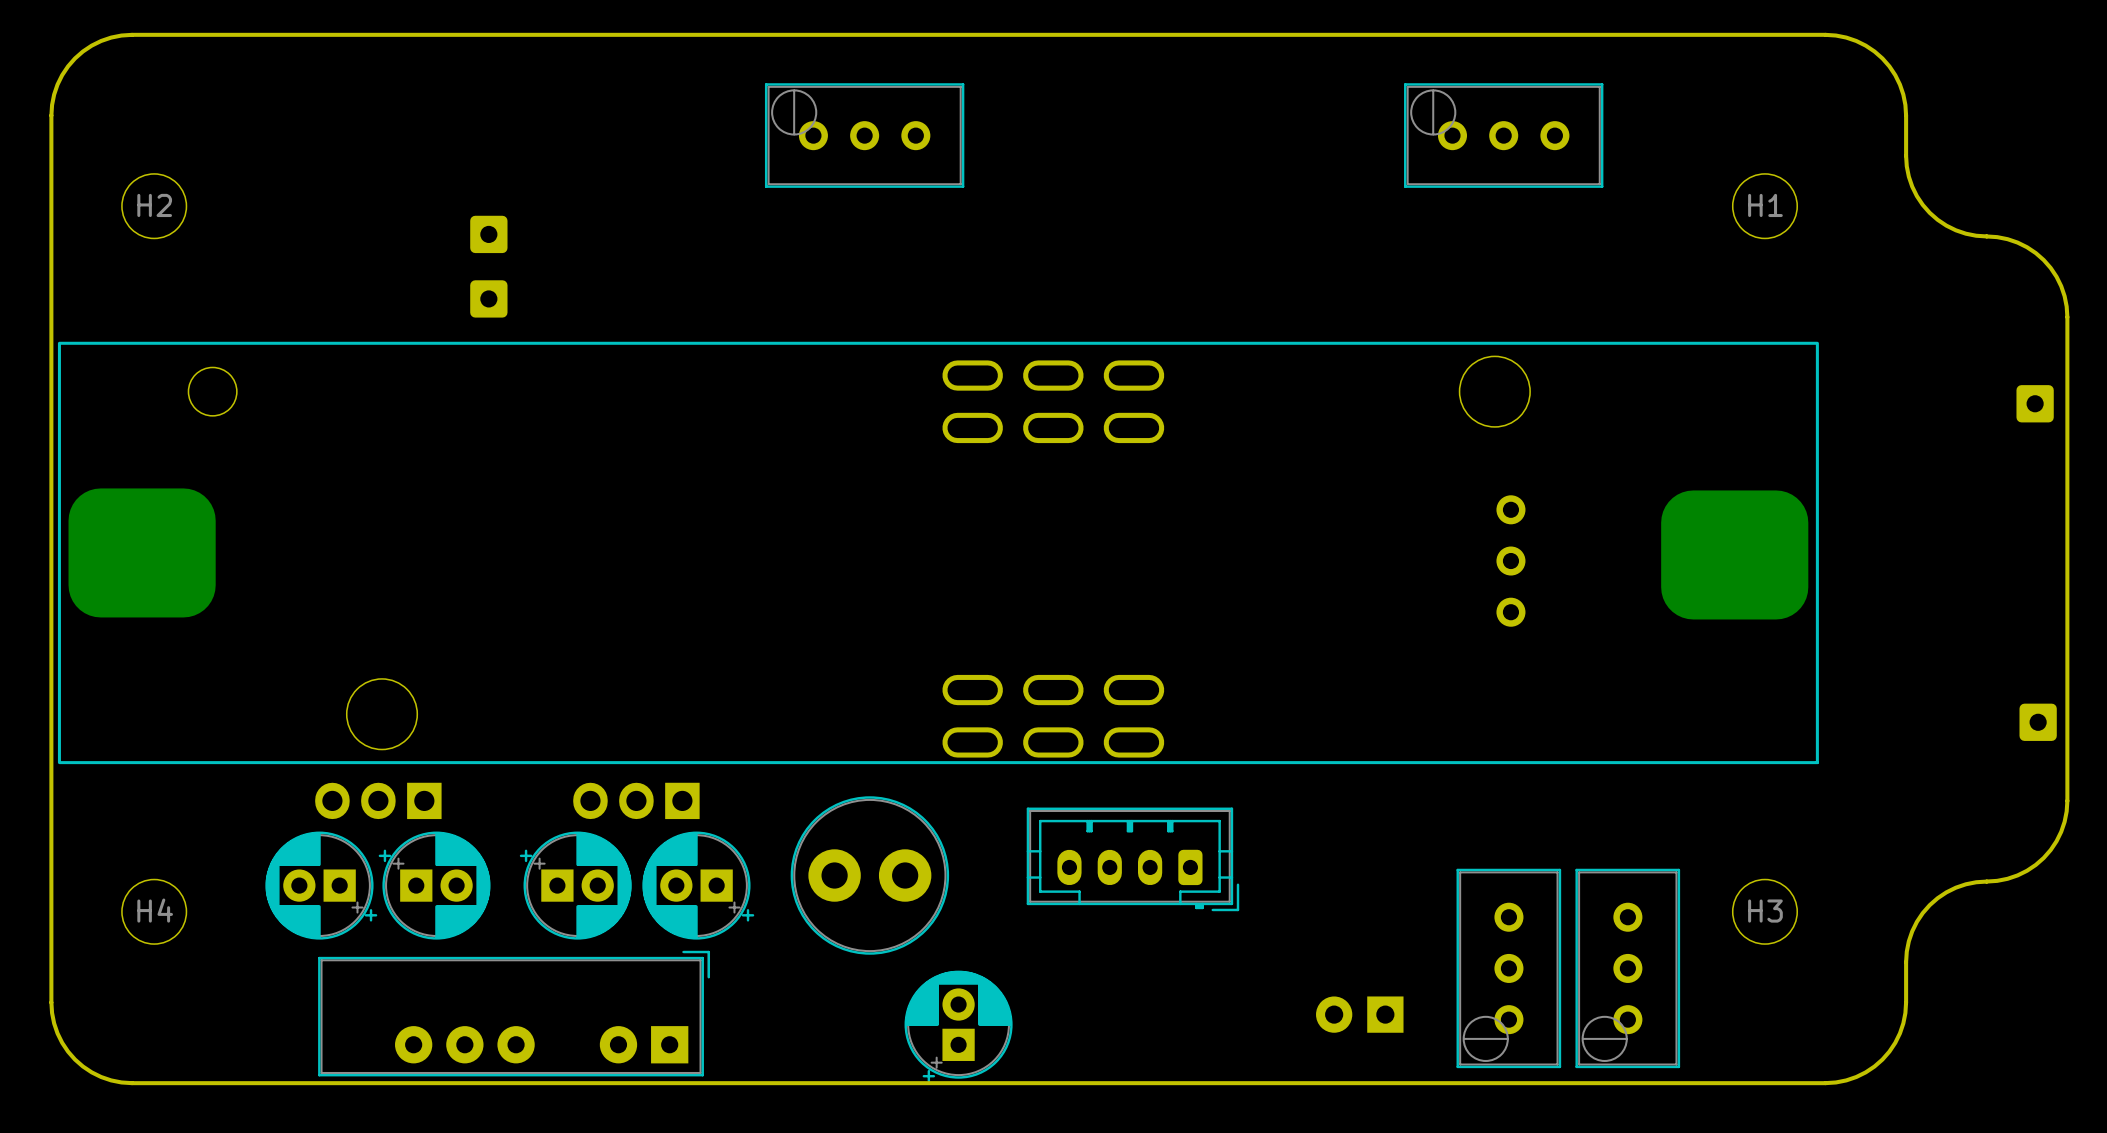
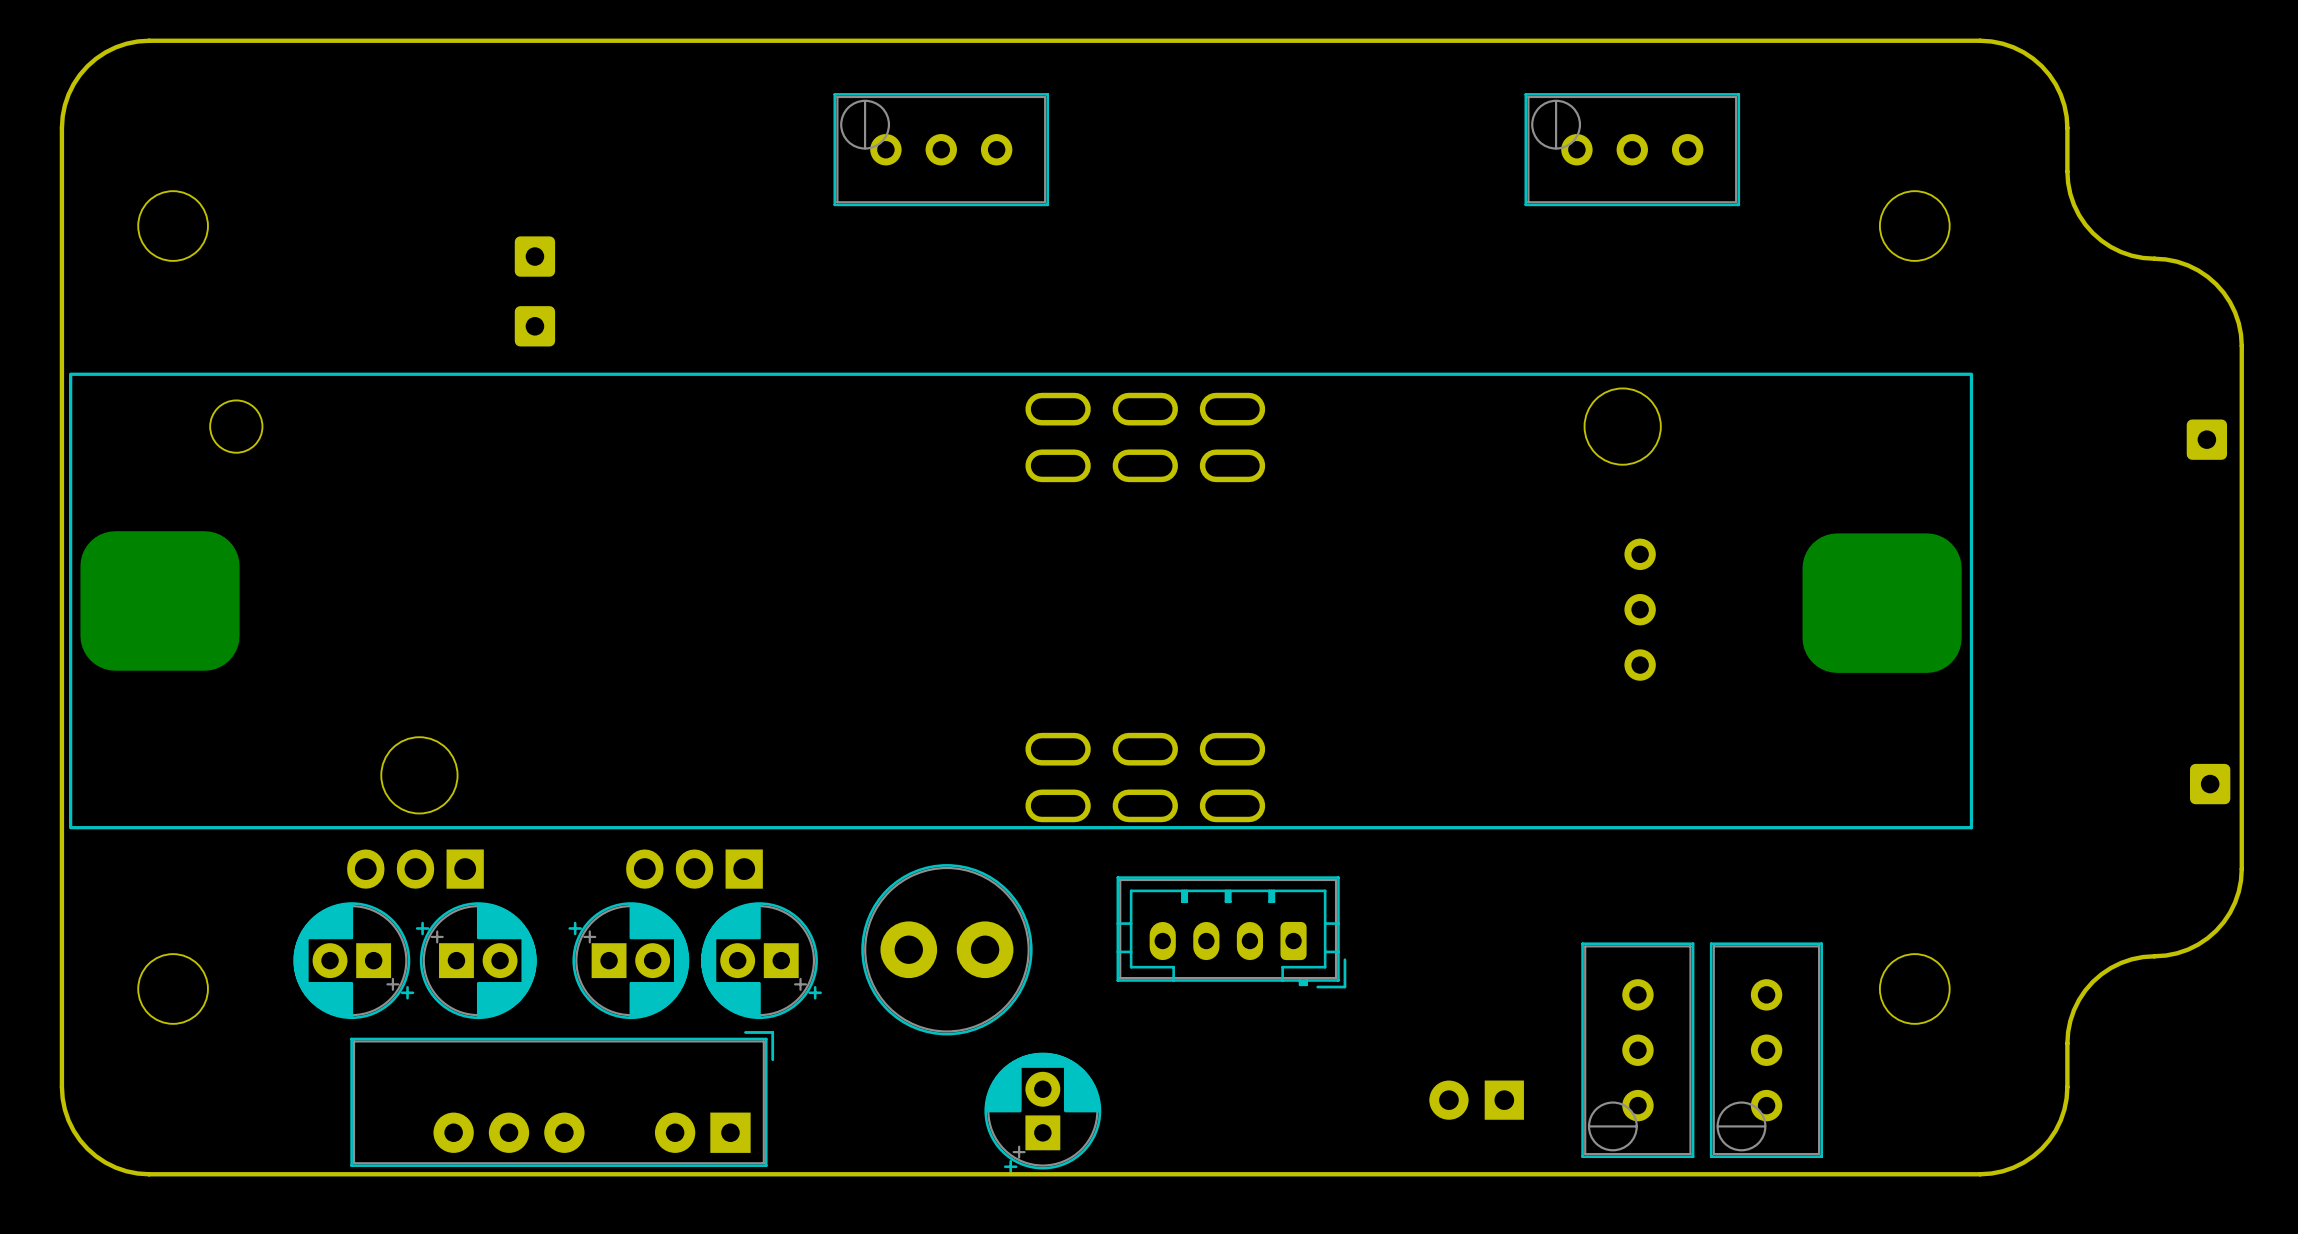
H2 name: H2 (154, 205) -> none
H1 name: H1 (1765, 205) -> none
H4 name: H4 (155, 910) -> none
H3 name: H3 (1765, 911) -> none

